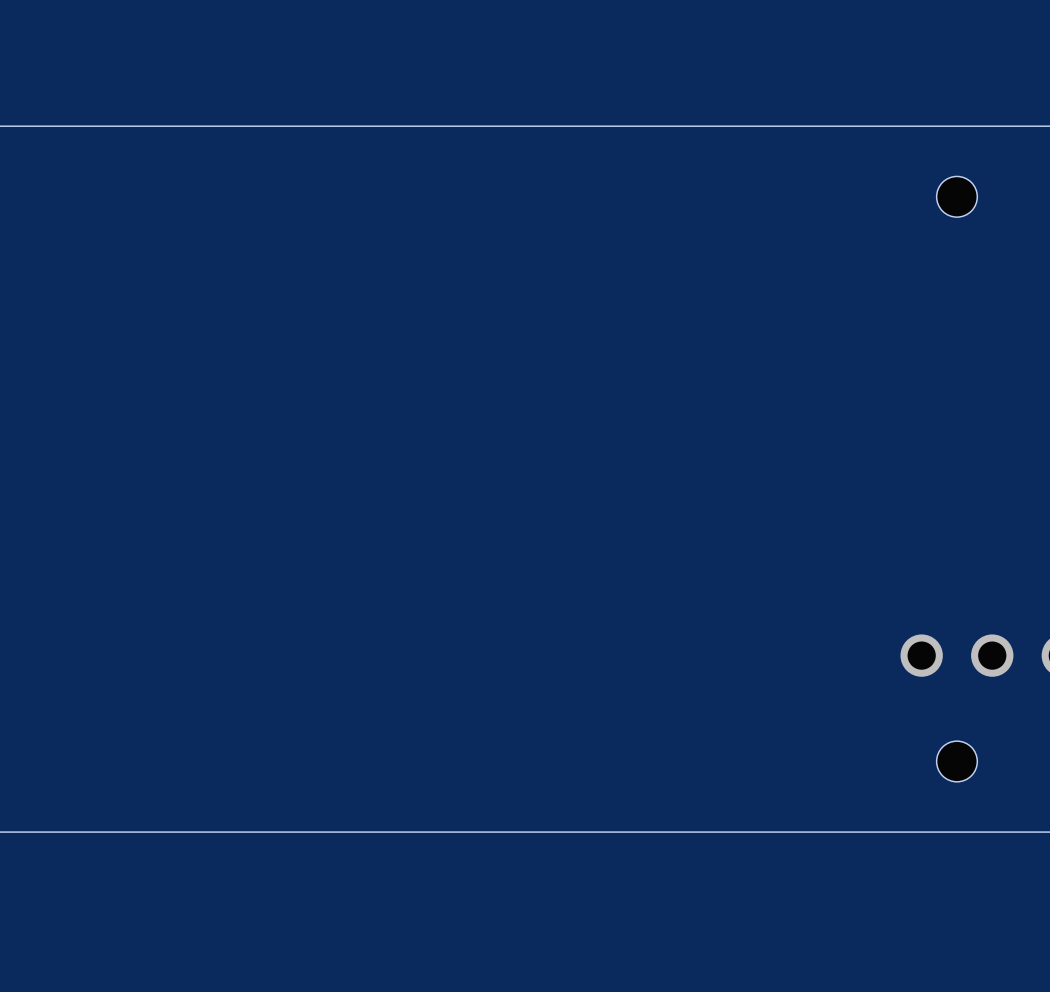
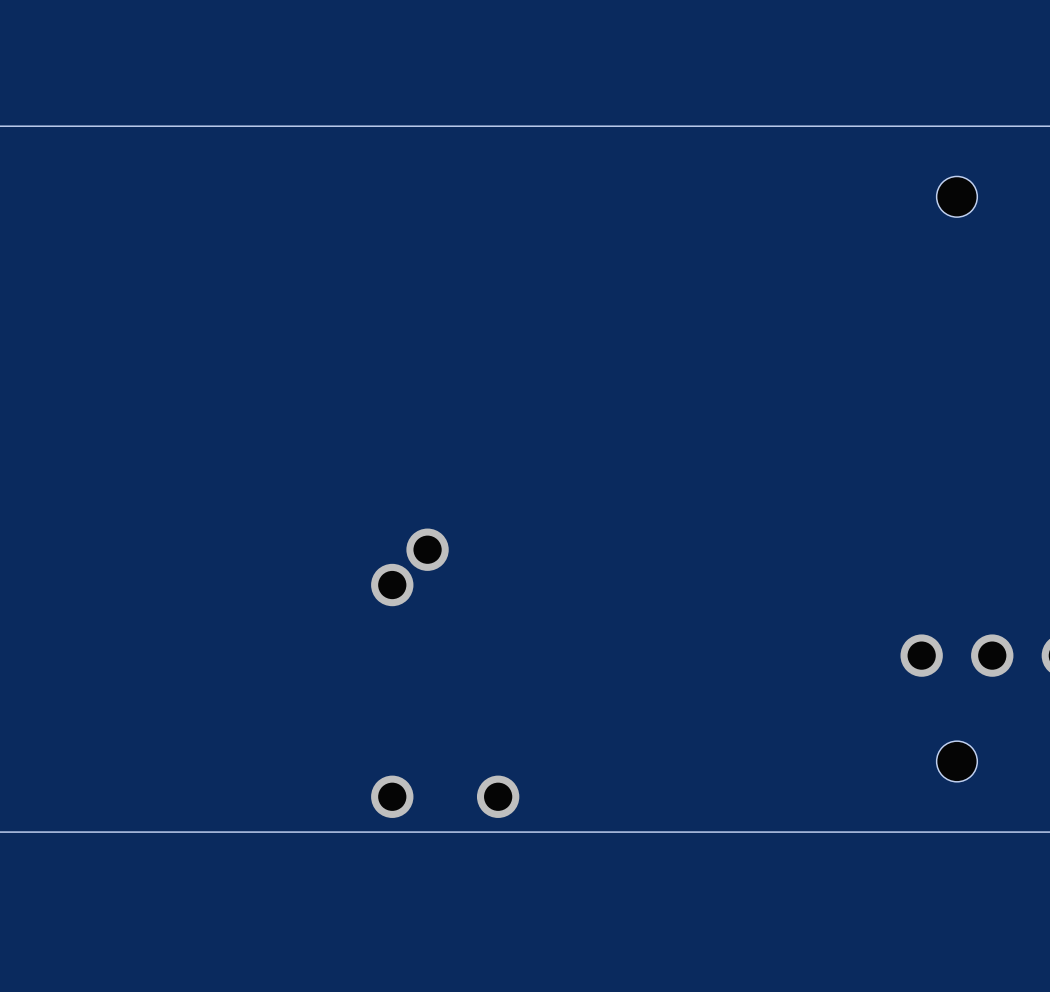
via: none -> (427, 549)
via: none -> (392, 585)
via: none -> (392, 796)
via: none -> (498, 796)

